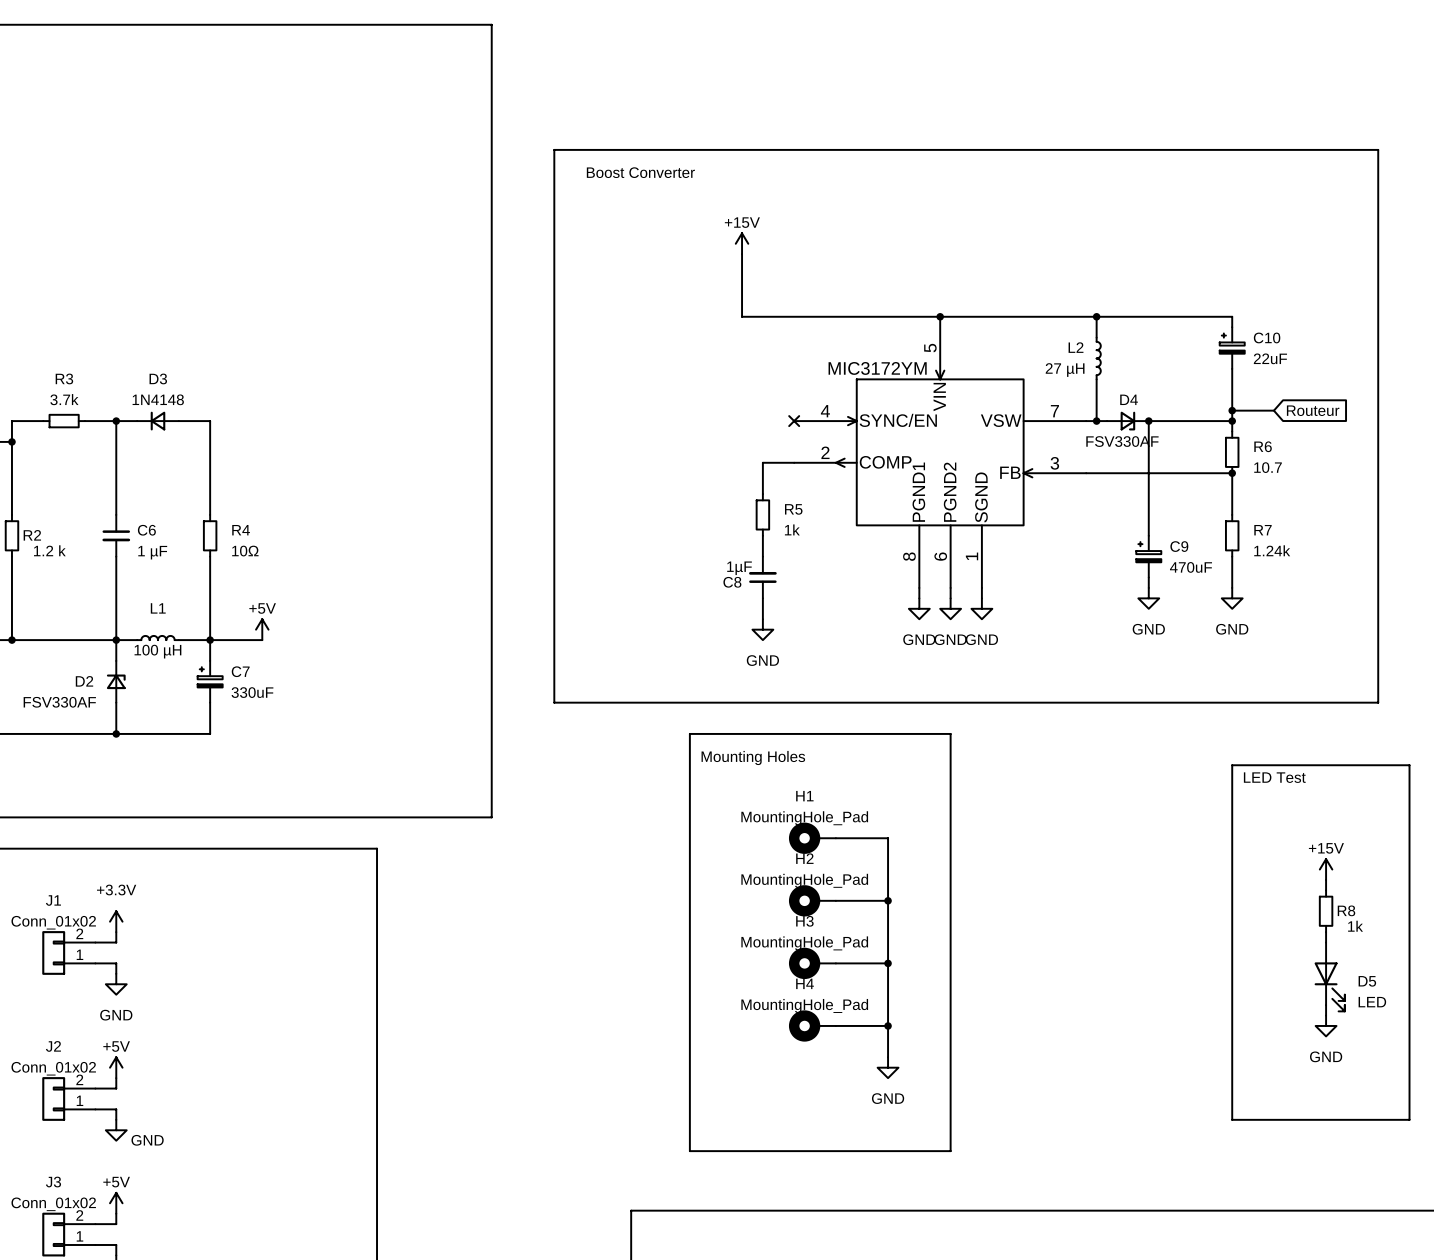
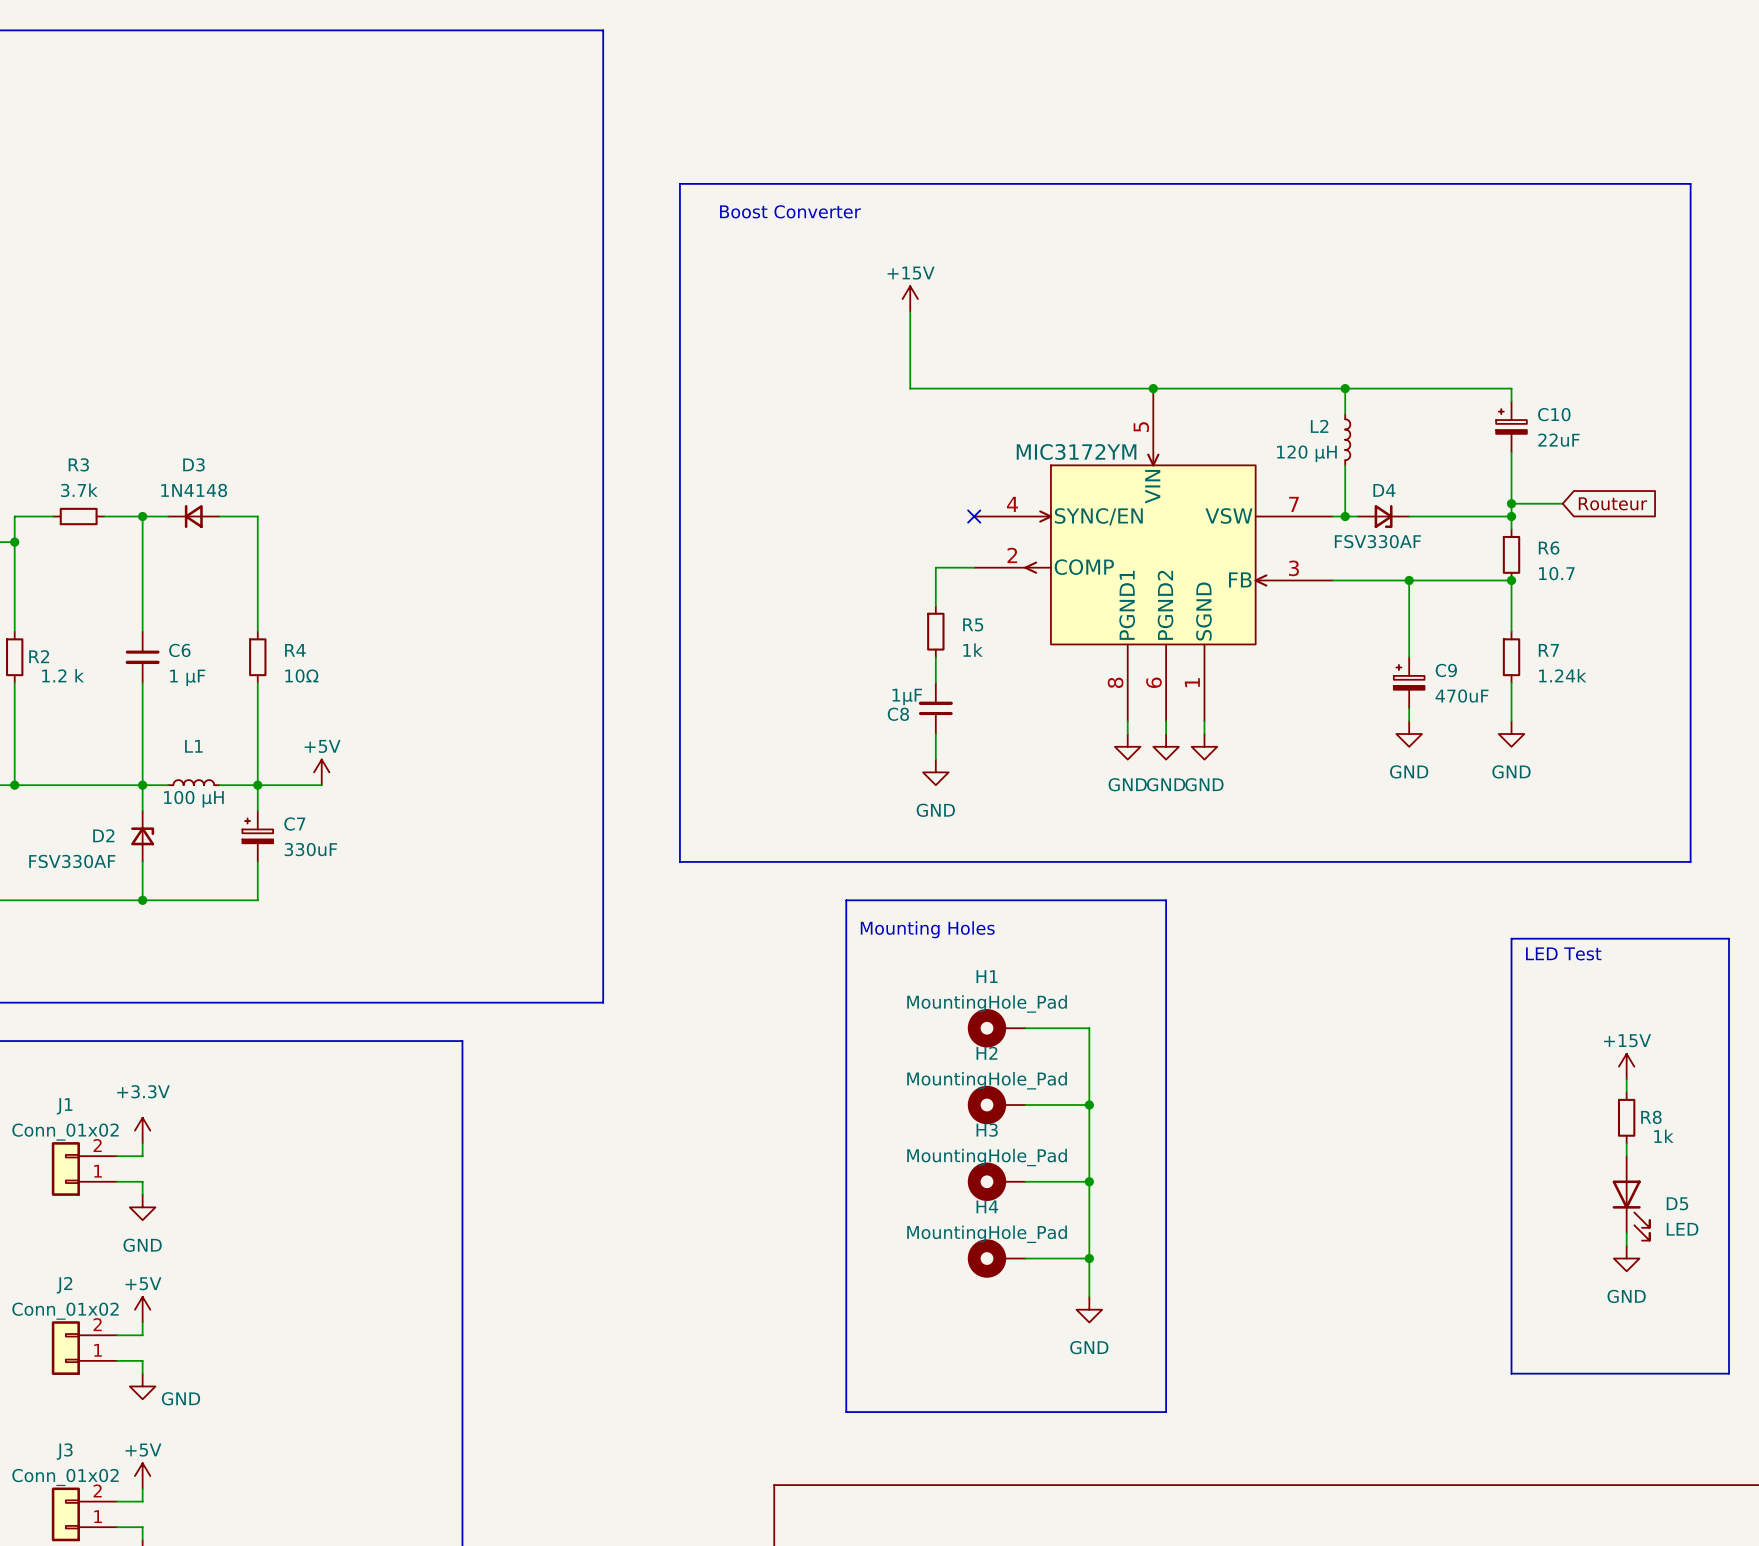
L2 value: 27 µH (1065, 370) -> 120 µH (1306, 453)
wire: (1148, 421) (1148, 473) -> none
junction: (1148, 421) -> none
junction: none -> (1409, 580)

